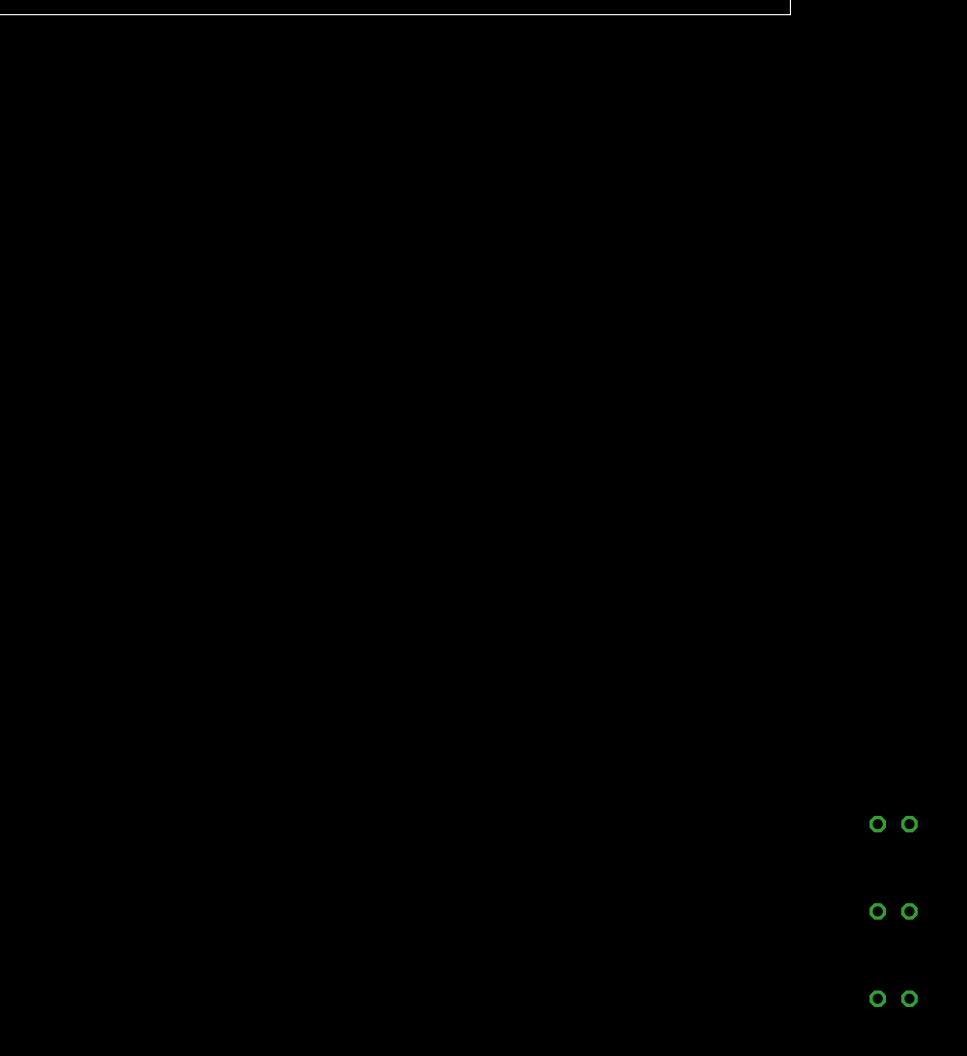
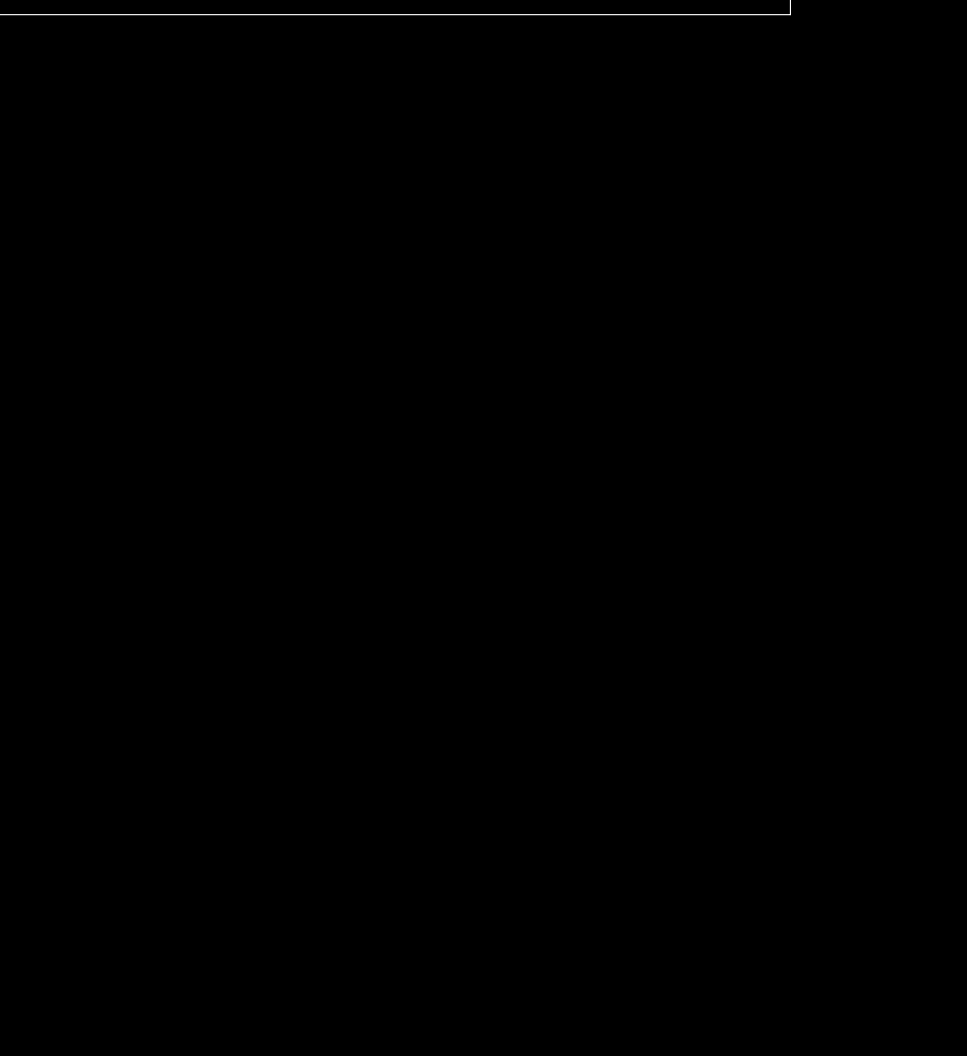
part: (893, 824) -> none
part: (893, 911) -> none
part: (893, 998) -> none

